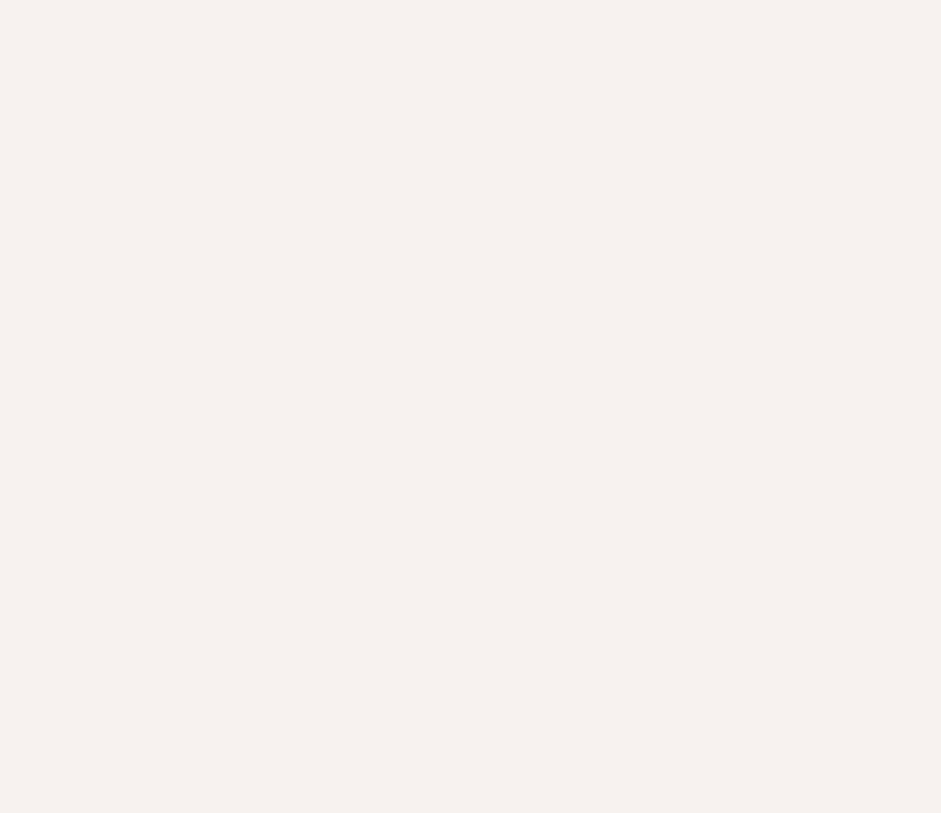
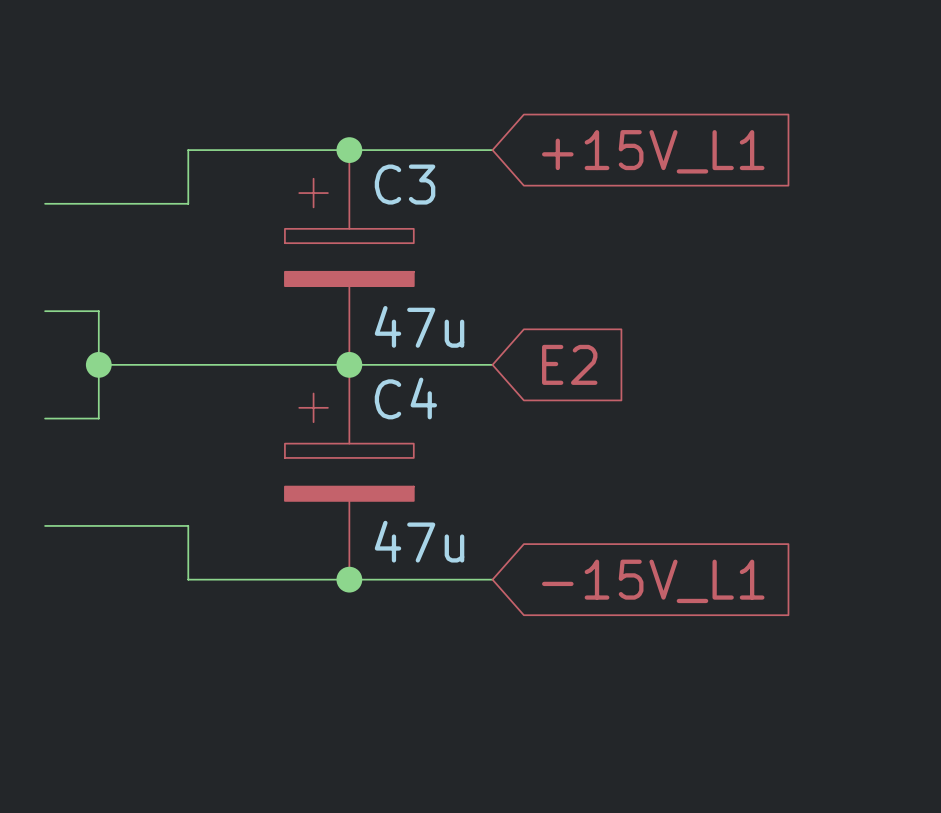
junction: none -> (349, 150)
wire: none -> (492, 150) (188, 150) (188, 203) (45, 203)
global label: none -> +15V_L1 (653, 151)
C3: none -> 47u (349, 257)
wire: none -> (45, 311) (98, 311) (98, 418) (45, 418)
wire: none -> (98, 364) (492, 364)
junction: none -> (98, 364)
junction: none -> (349, 364)
global label: none -> E2 (569, 364)
C4: none -> 47u (349, 472)
wire: none -> (45, 525) (188, 525) (188, 579) (492, 579)
junction: none -> (349, 579)
global label: none -> -15V_L1 (653, 581)

